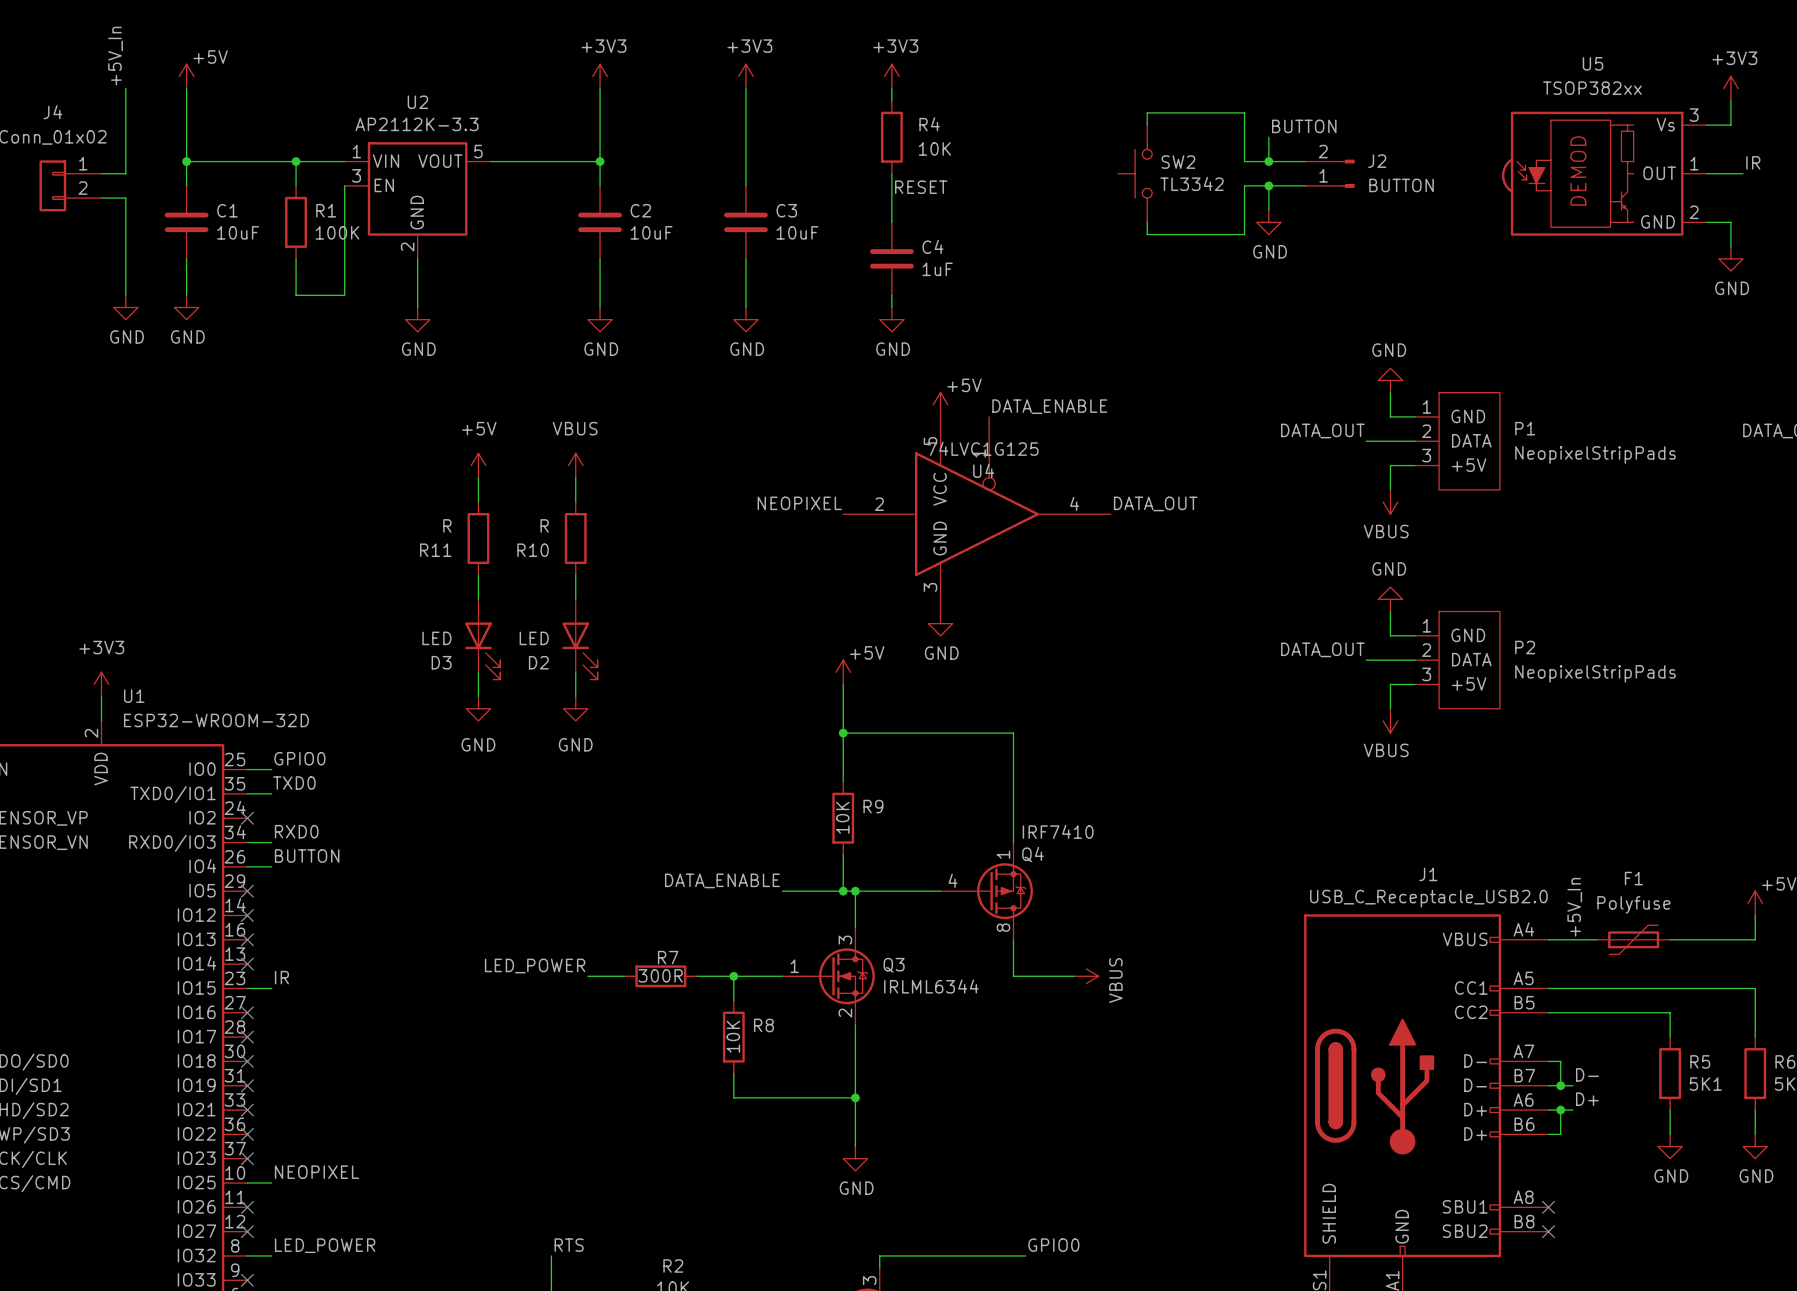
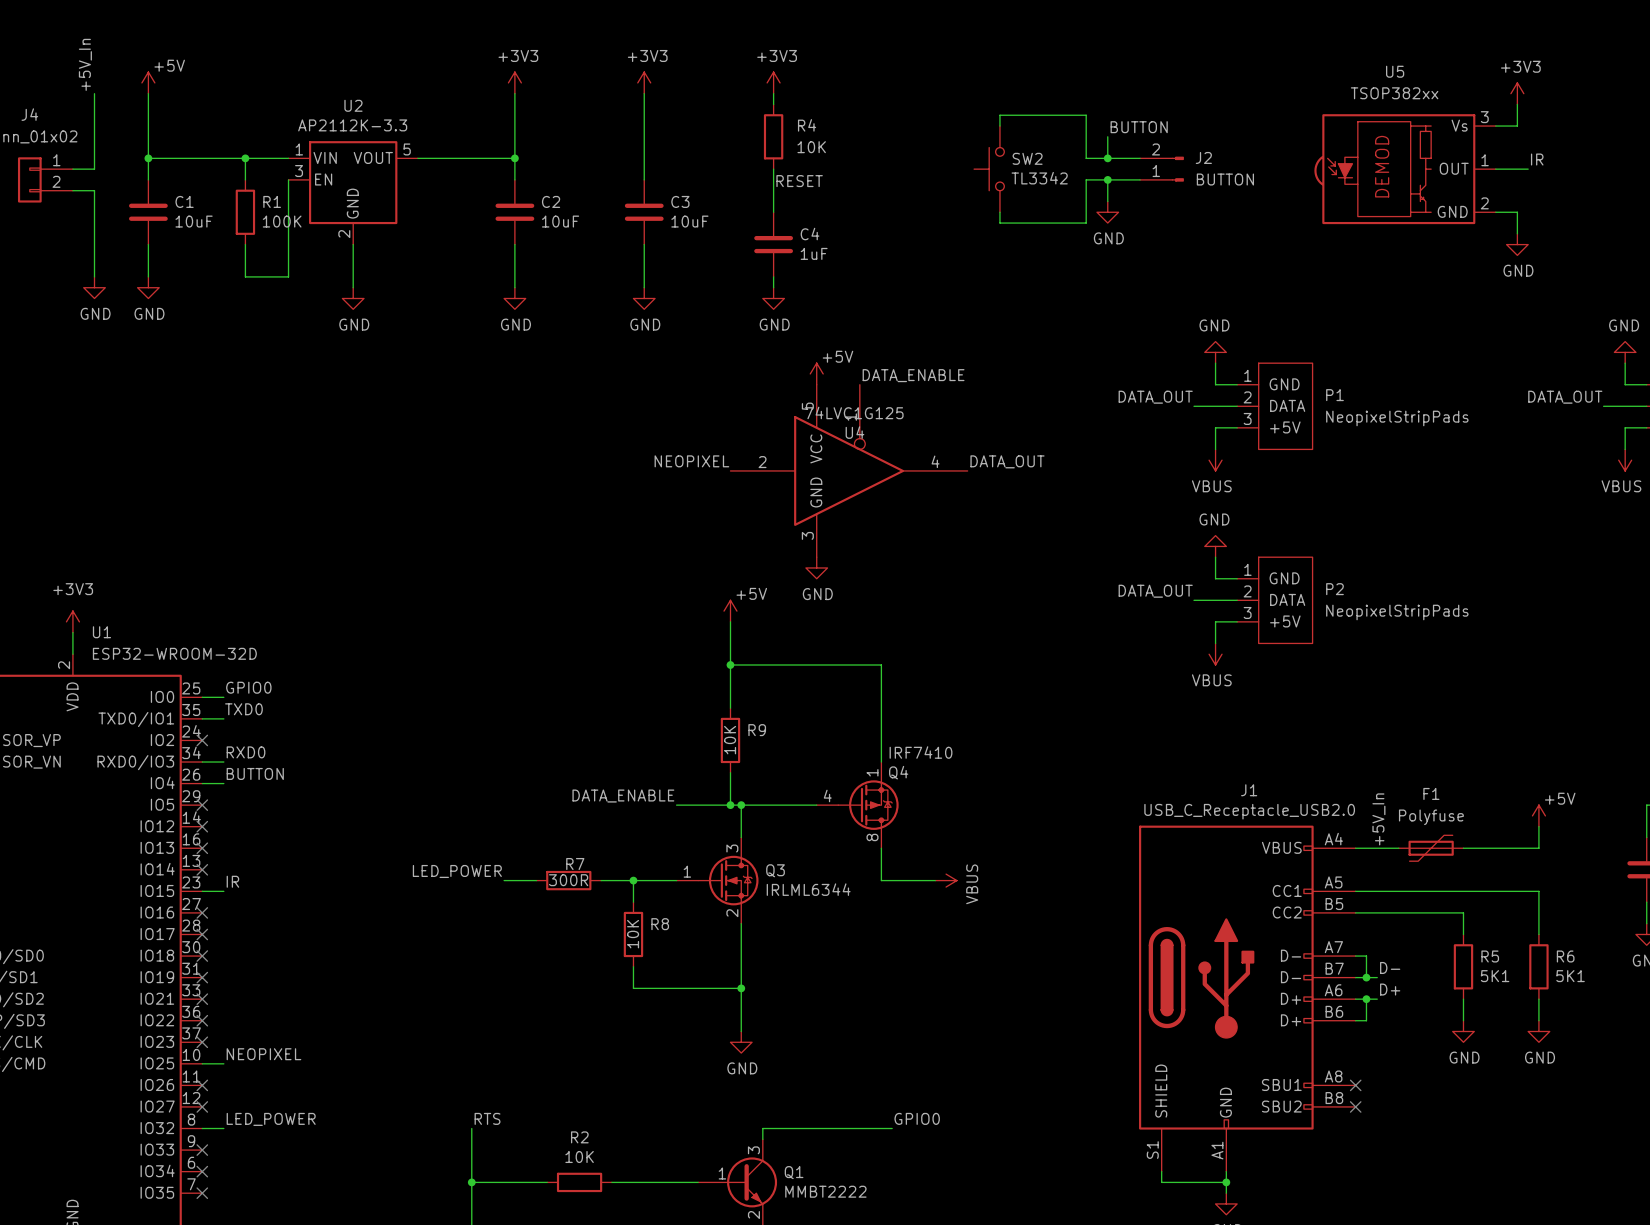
power symbol: +5V (478, 465) -> none
power symbol: VBUS (575, 465) -> none
wire: (478, 477) (478, 502) -> none
wire: (575, 477) (575, 502) -> none
R11: R (478, 538) -> none
R10: R (575, 538) -> none
wire: (478, 575) (478, 599) -> none
wire: (575, 575) (575, 599) -> none
D3: LED (482, 639) -> none
D2: LED (579, 639) -> none
wire: (478, 672) (478, 696) -> none
wire: (575, 672) (575, 696) -> none
power symbol: GND (478, 708) -> none
power symbol: GND (575, 708) -> none

